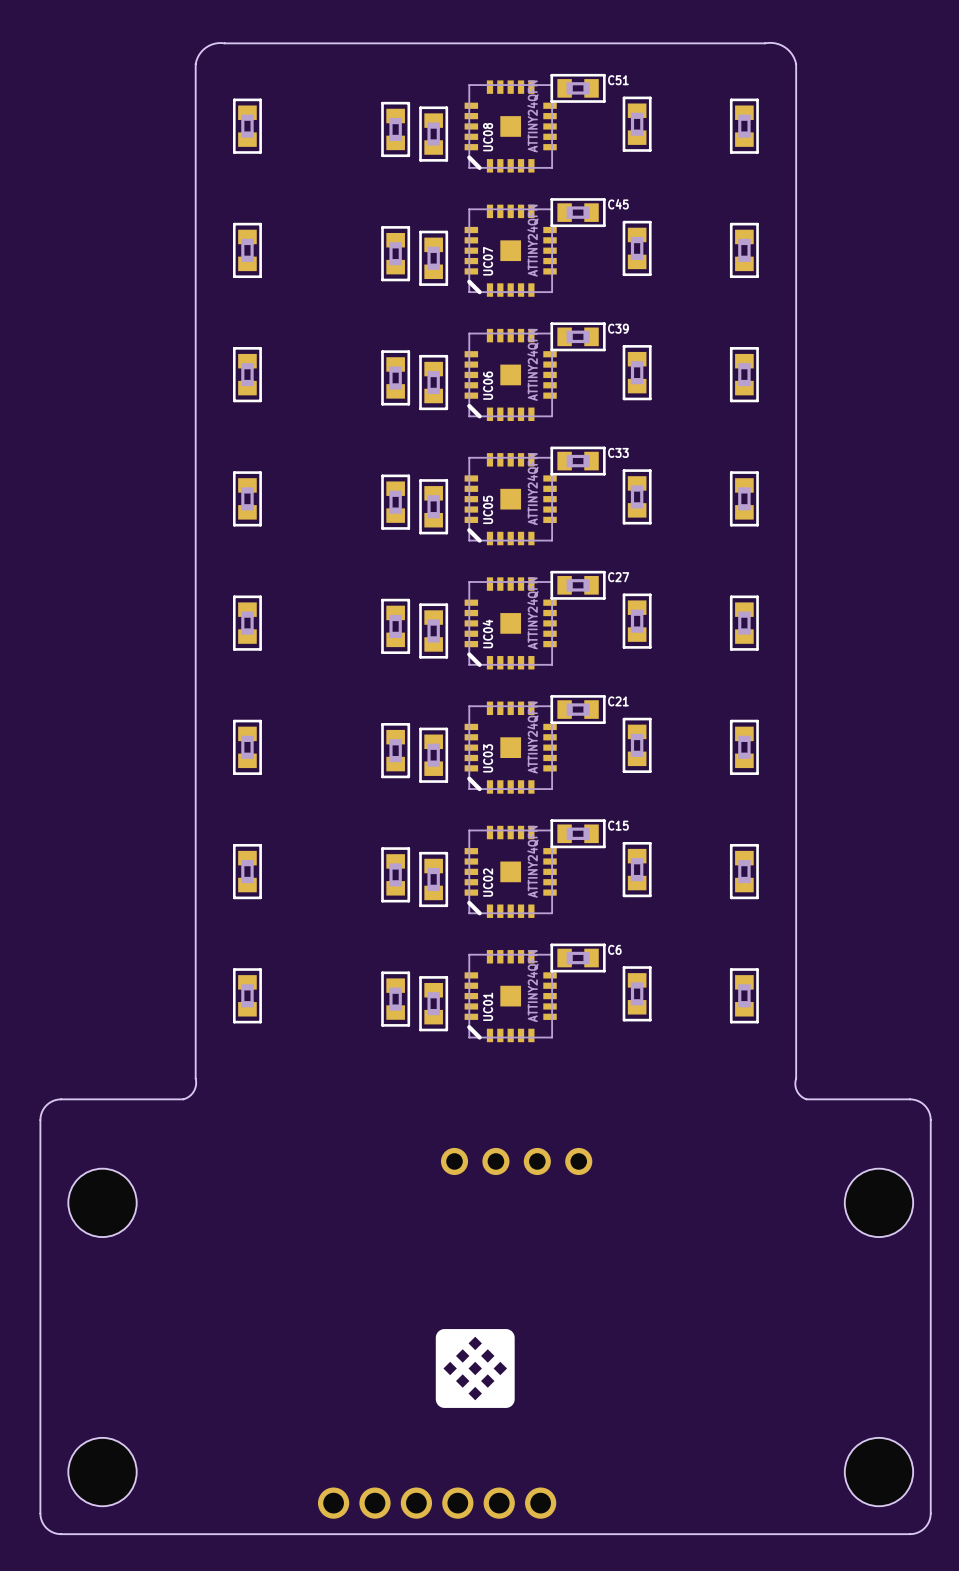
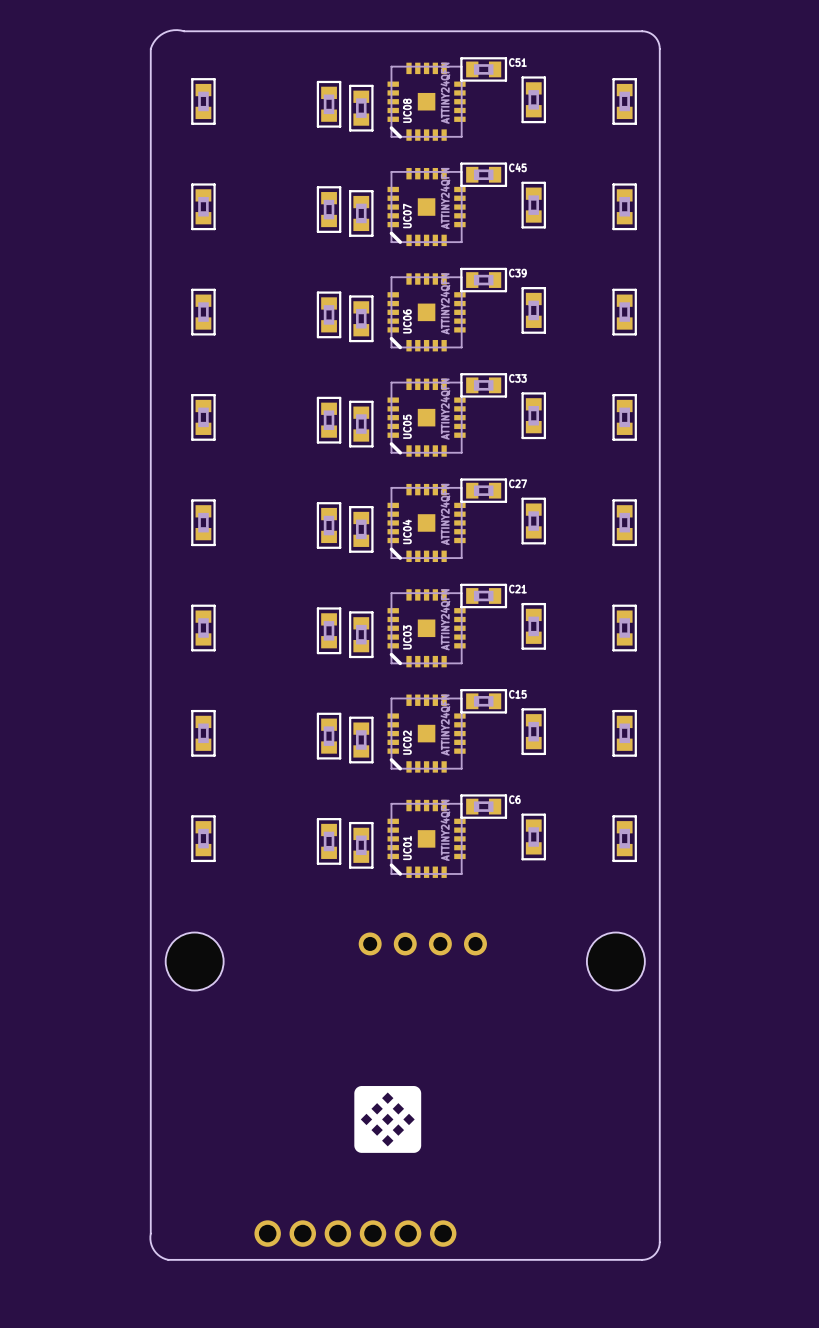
board edge: (765, 43) (775, 43) (784, 47) (792, 54) (796, 64) (795, 1084) (799, 1094) (806, 1099) (912, 1099) (922, 1103) (930, 1114) (930, 1513) (929, 1521) (922, 1529) (910, 1534) (58, 1533) (50, 1531) (44, 1526) (40, 1513) (41, 1114) (48, 1103) (58, 1099) (183, 1099) (192, 1093) (196, 1085) (195, 64) (199, 54) (205, 47) (214, 43) (224, 43) -> (642, 31) (654, 36) (659, 48) (658, 1249) (652, 1256) (642, 1259) (168, 1259) (155, 1252) (150, 1239) (150, 48) (155, 39) (163, 33) (173, 30) (184, 31)
part: none -> (370, 943)
part: none -> (405, 943)
part: none -> (440, 943)
part: none -> (475, 943)
part: (454, 1161) -> none
part: (495, 1161) -> none
part: (537, 1161) -> none
part: (578, 1161) -> none
part position: (102, 1202) -> (194, 961)
part position: (878, 1202) -> (615, 961)
drawing position: (475, 1368) -> (387, 1119)
part: (102, 1472) -> none
part: (878, 1472) -> none
part position: (437, 1503) -> (355, 1233)

